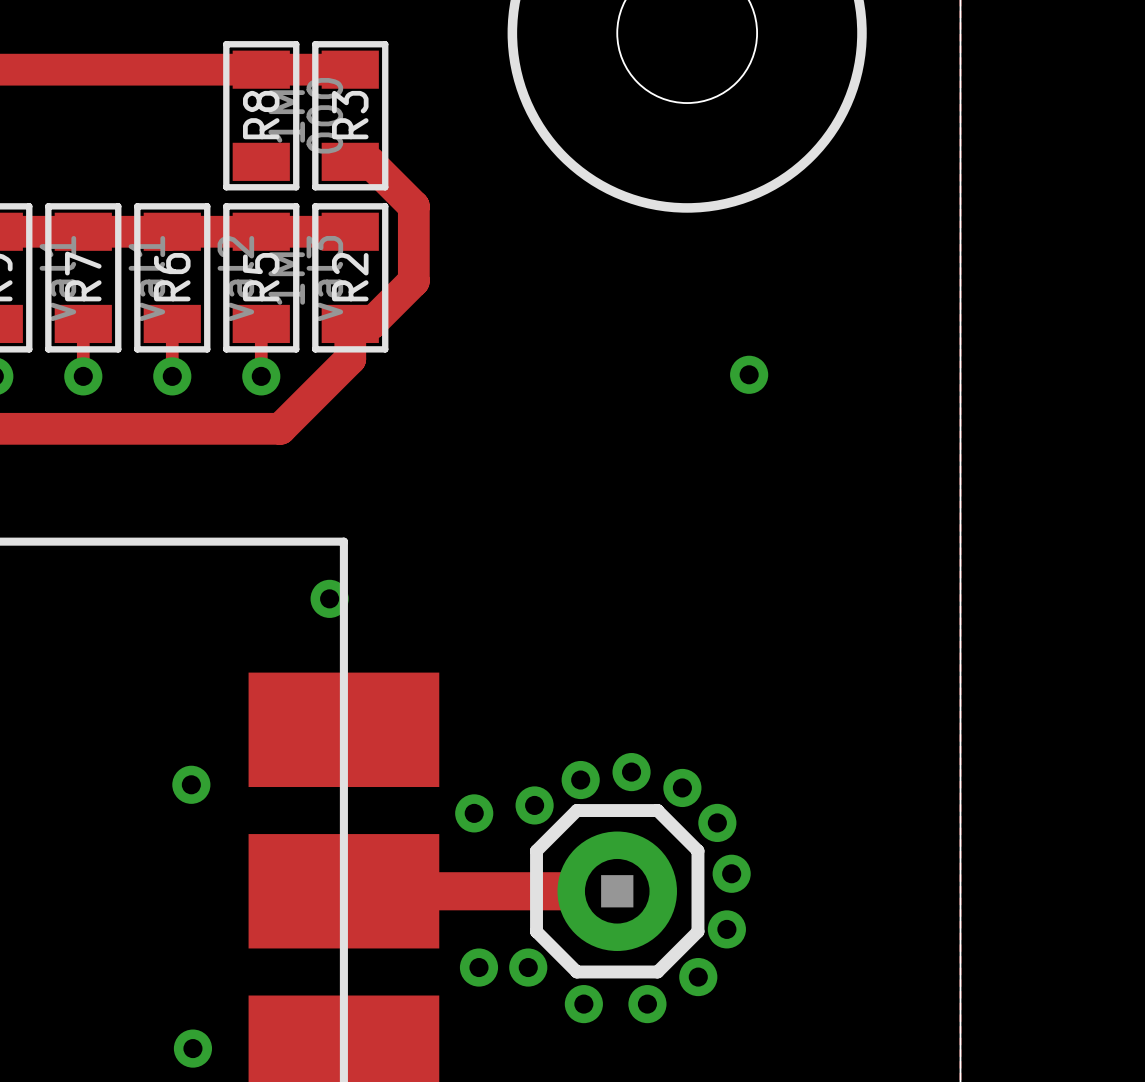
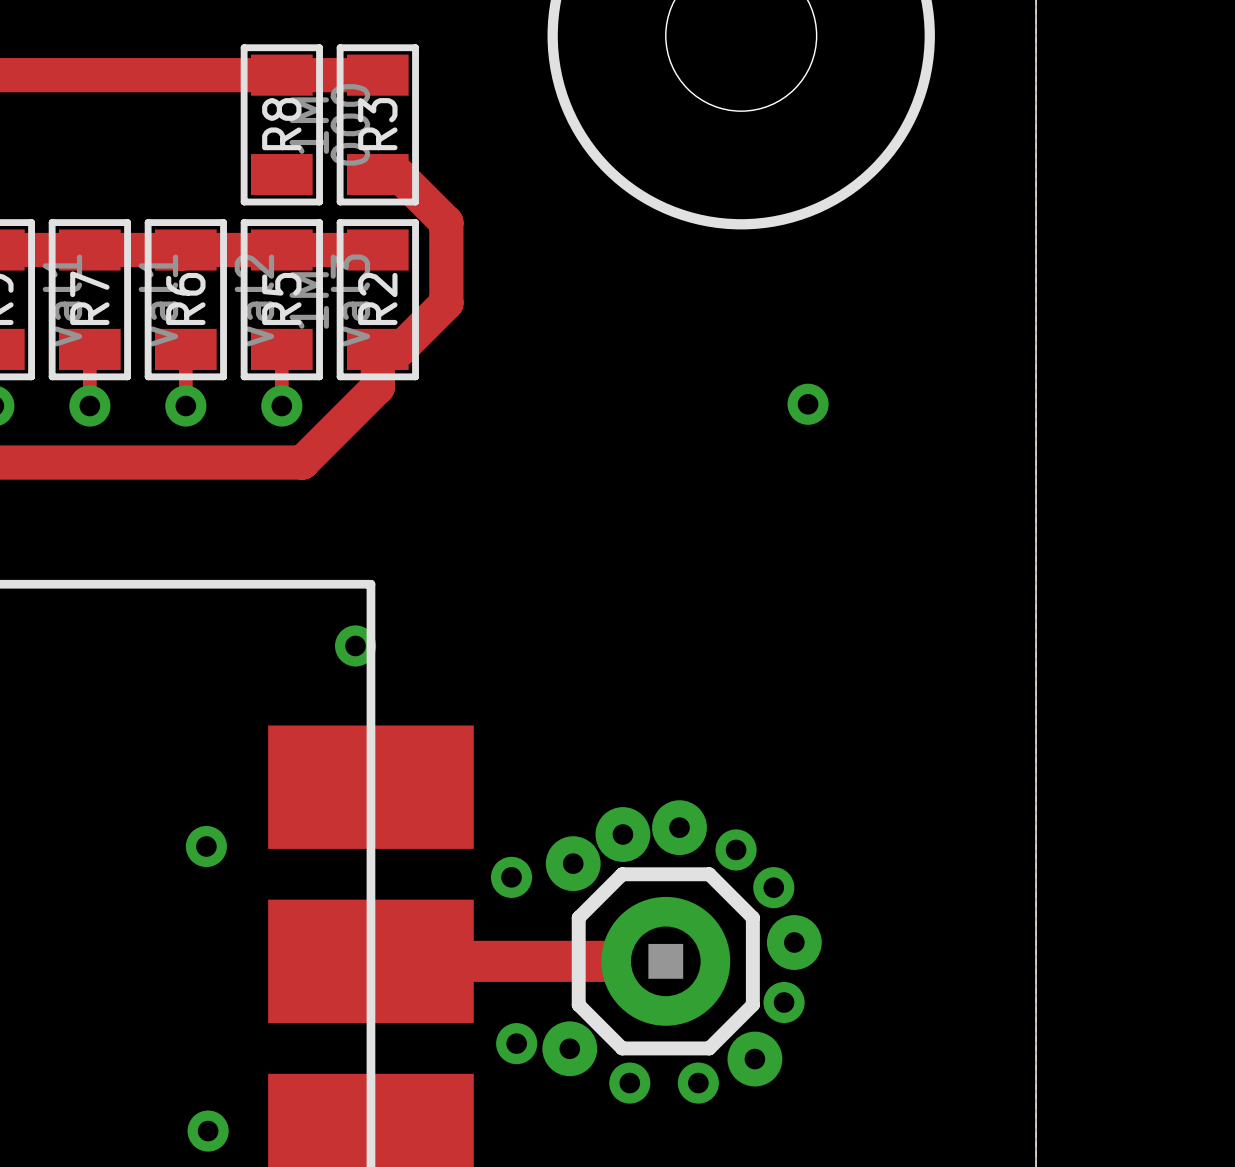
via size: [612, 753, 651, 792] -> [652, 800, 707, 856]
via size: [561, 760, 600, 800] -> [595, 807, 651, 862]
via size: [515, 786, 554, 825] -> [545, 836, 601, 892]
via size: [712, 854, 751, 893] -> [766, 915, 822, 970]
via size: [509, 948, 548, 987] -> [542, 1021, 598, 1077]
via size: [679, 958, 718, 997] -> [727, 1031, 783, 1087]

